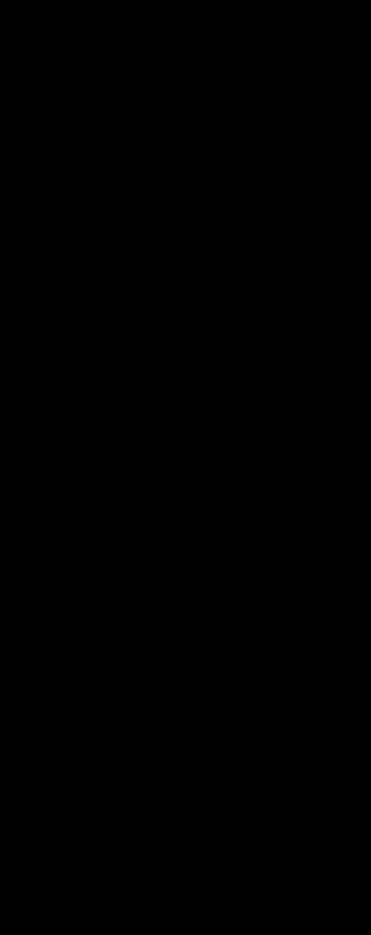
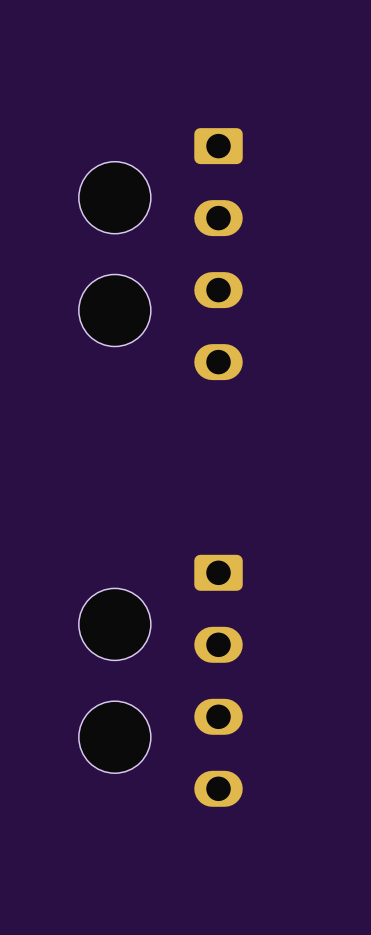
part: none -> (160, 254)
part: none -> (160, 680)

